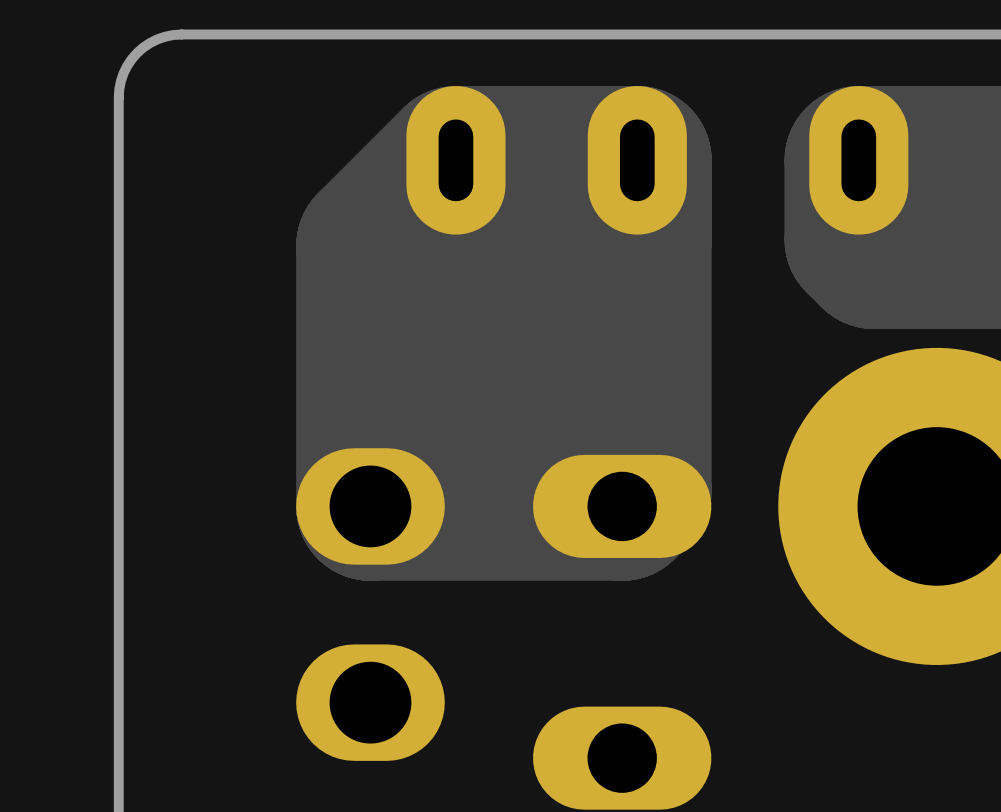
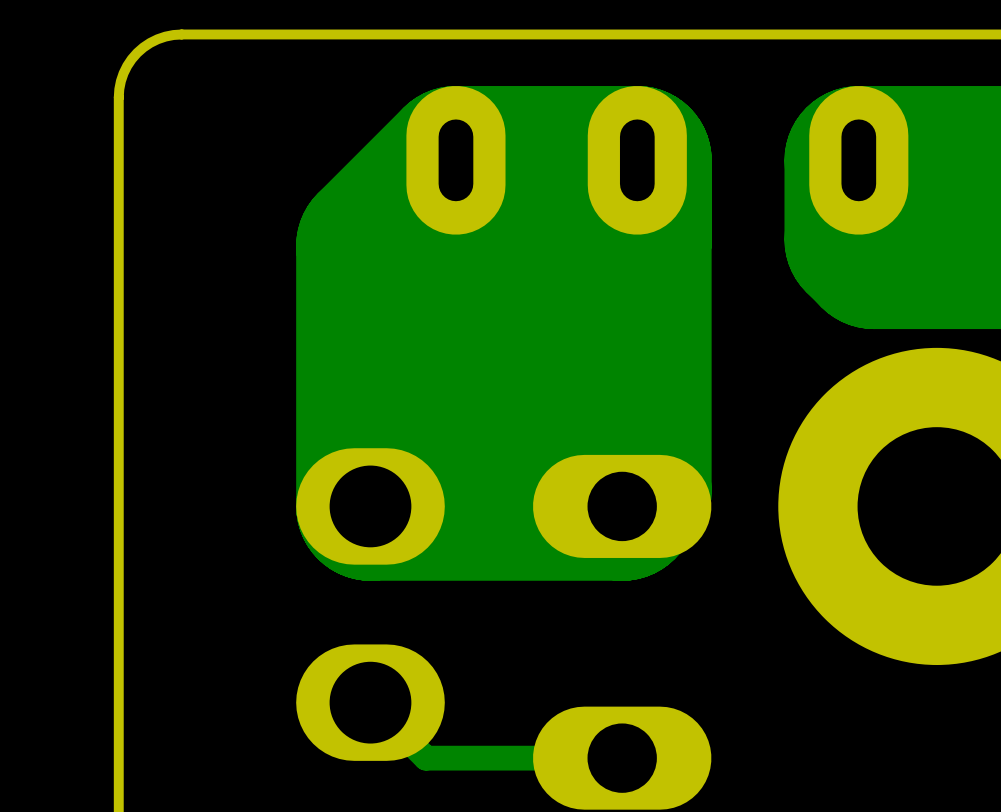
track: none -> (370, 702) (425, 758) (622, 758)

